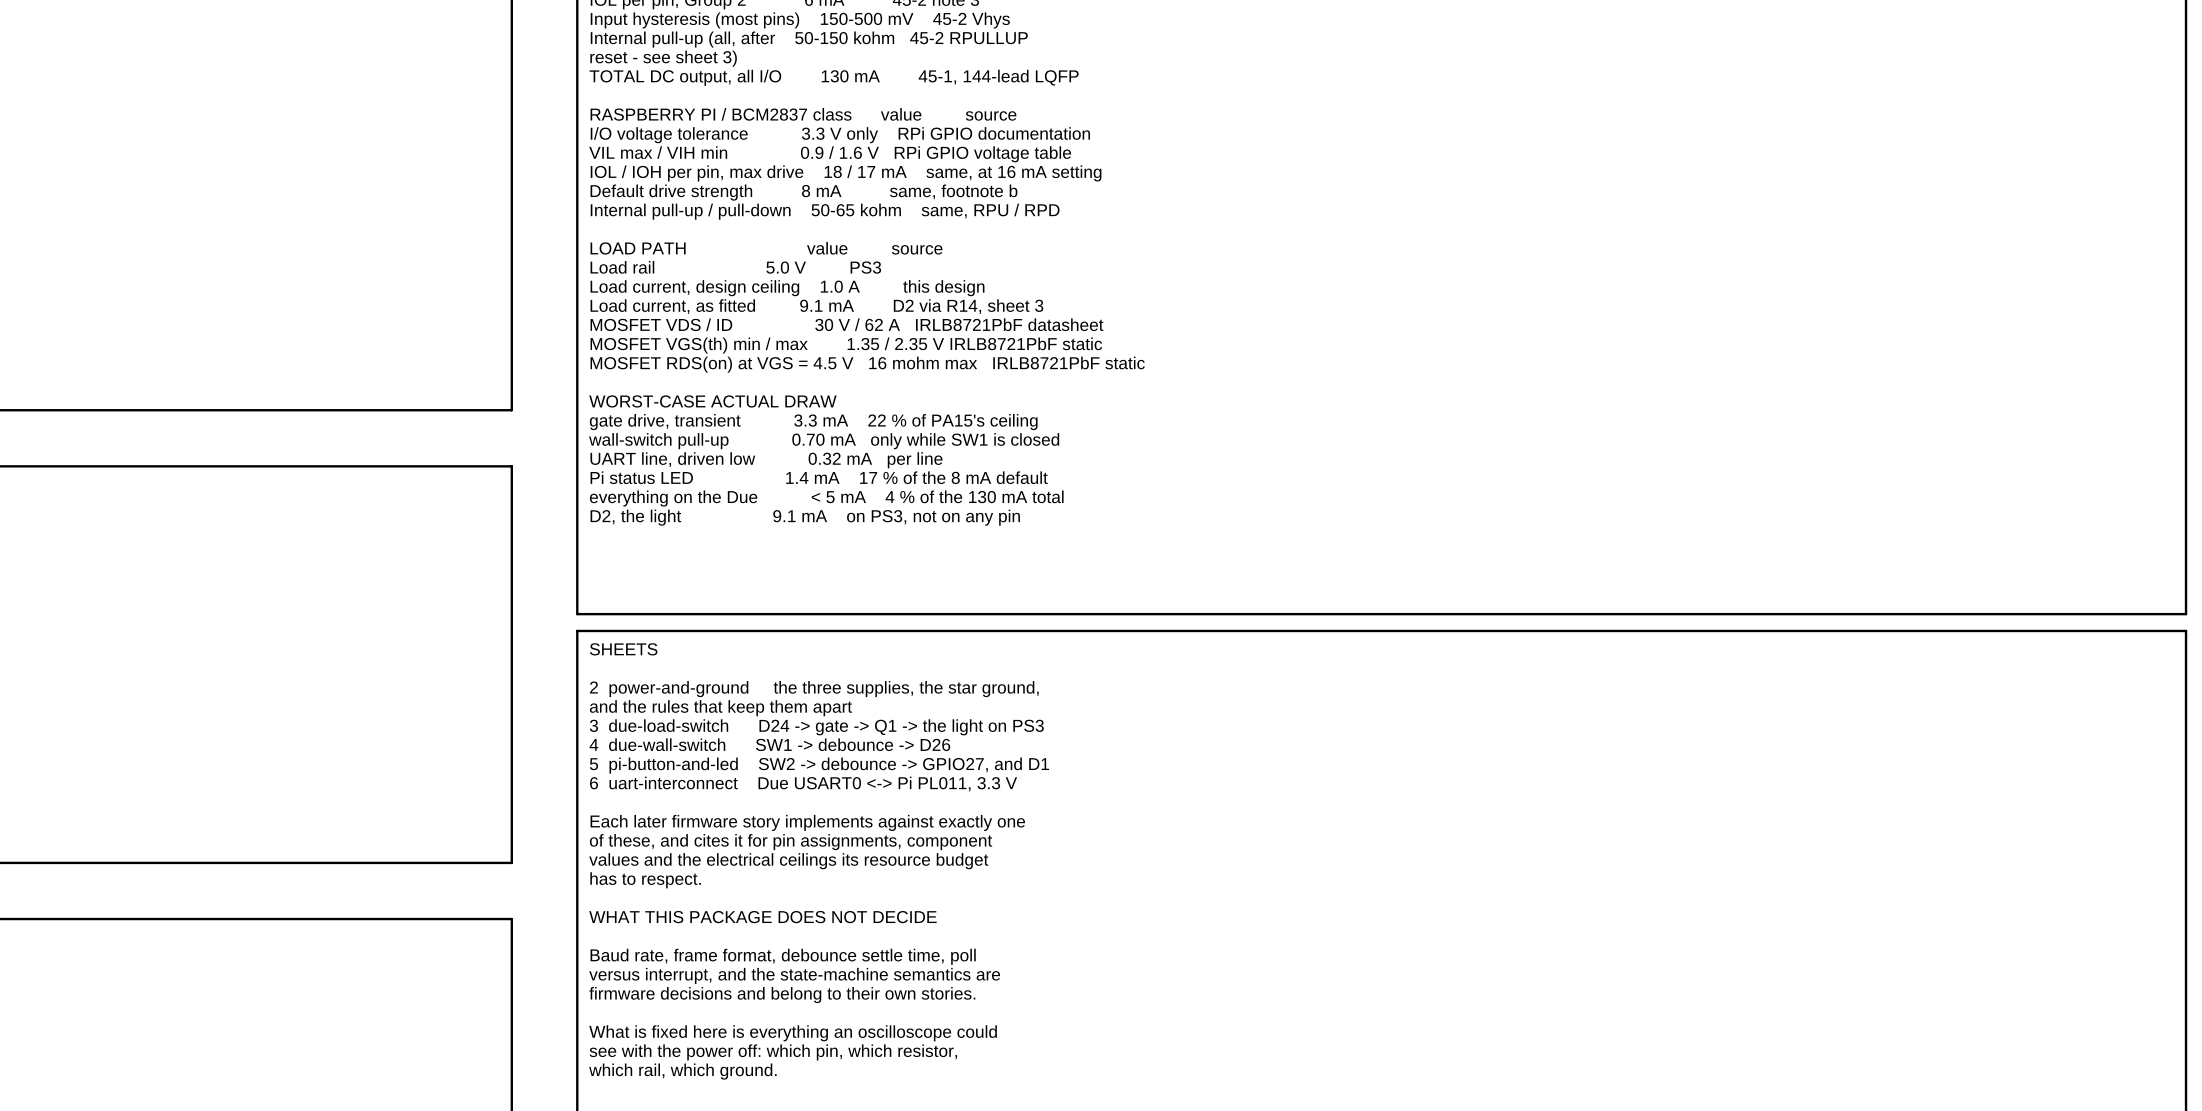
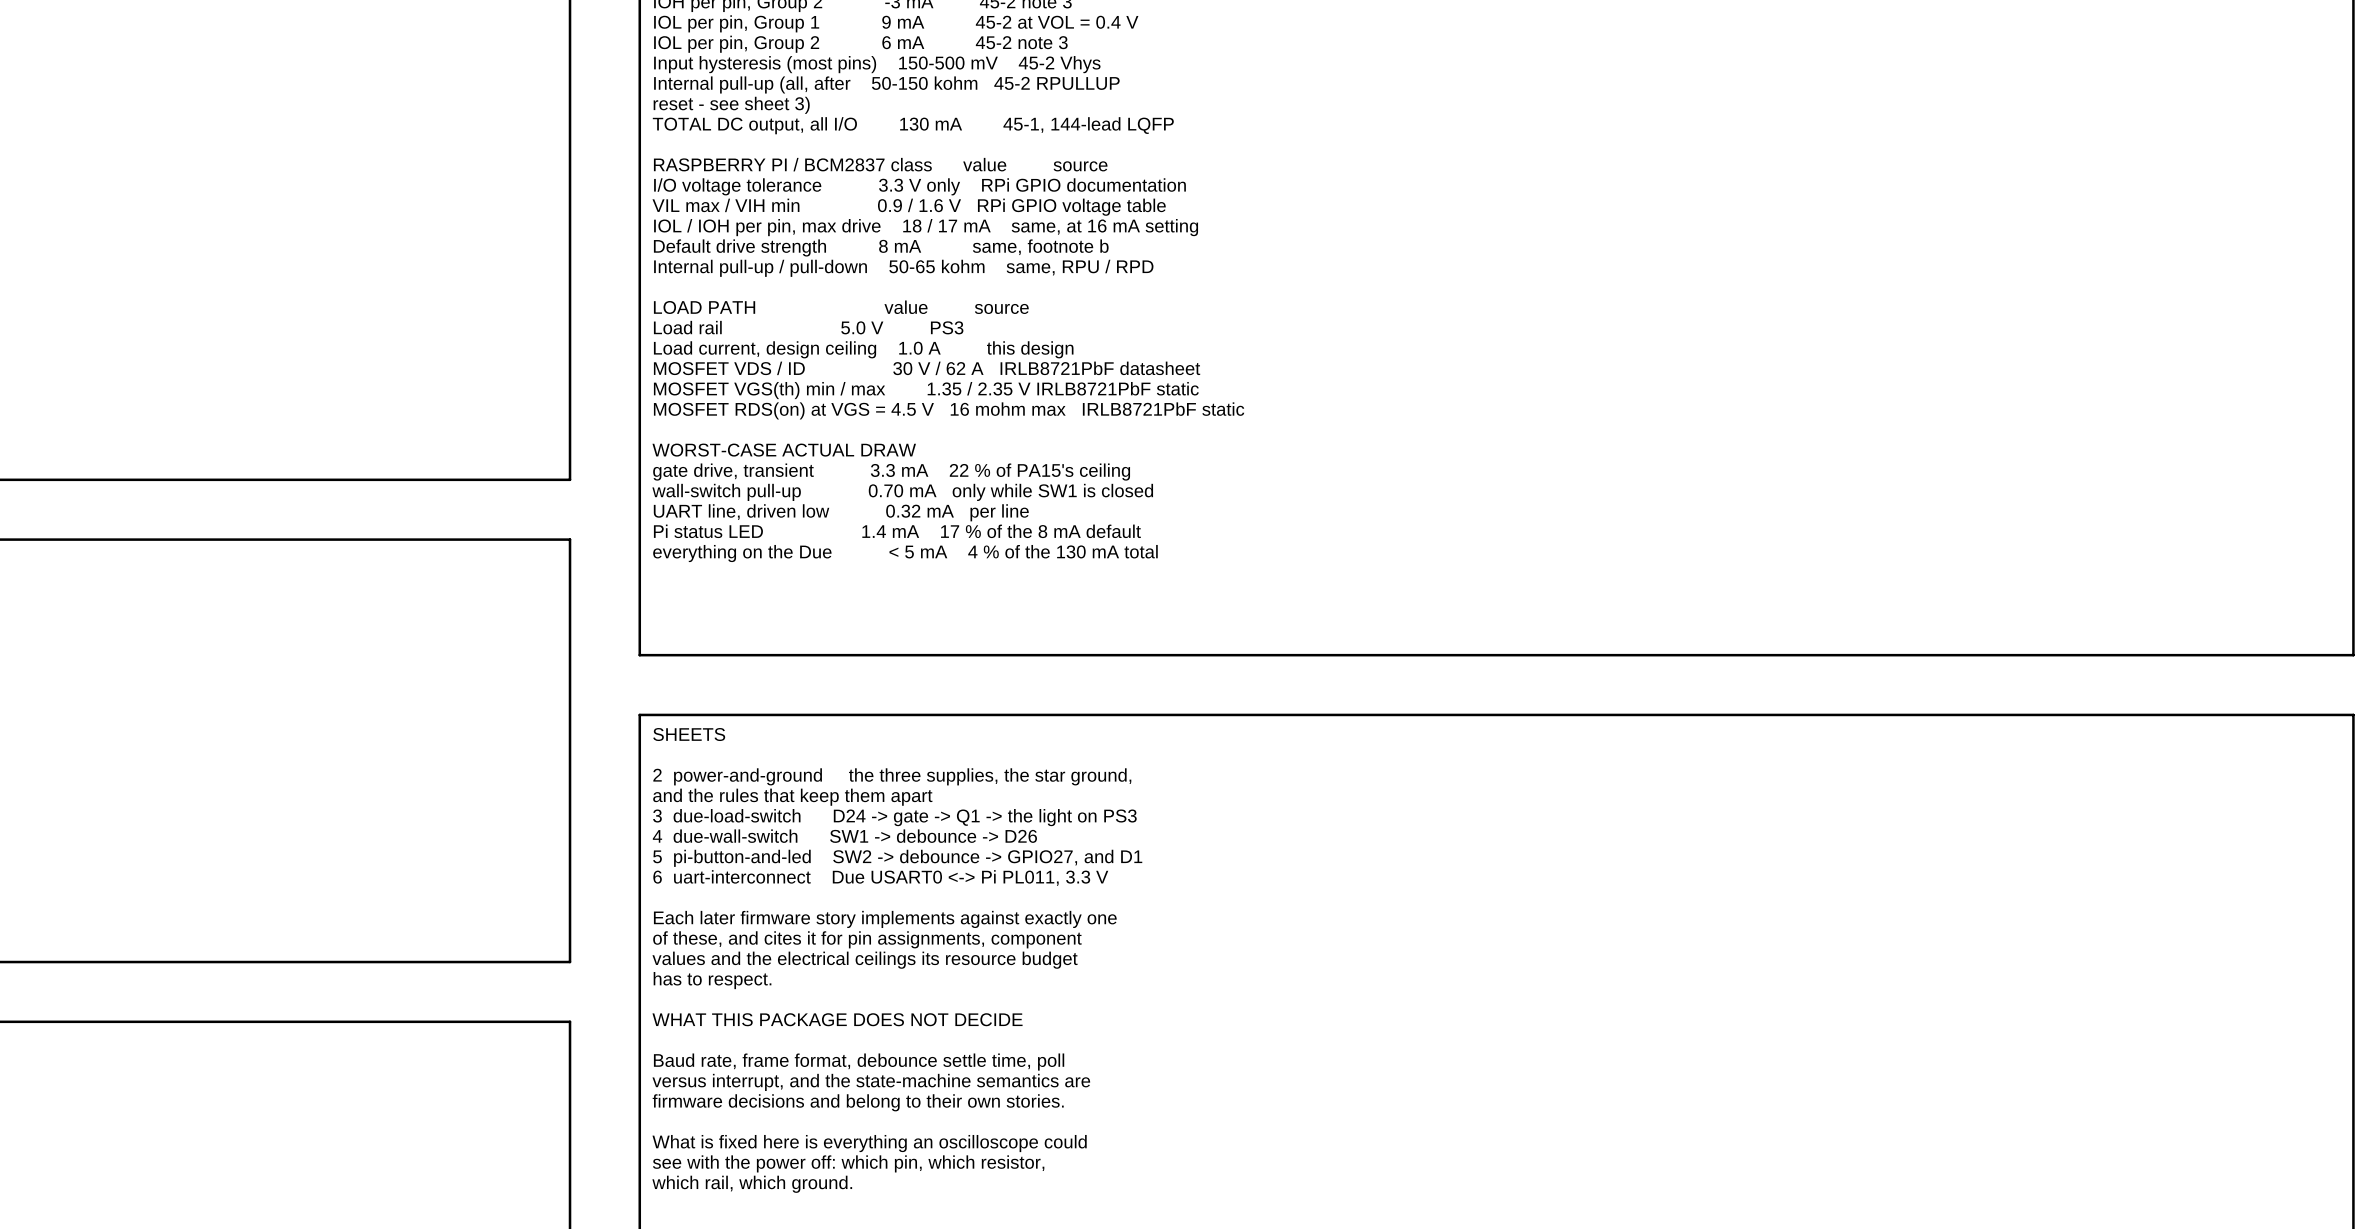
text: Load current, as fitted 9.1 mA D2 via R14, sheet 3 (816, 306) -> MOSFET VDS / ID 30 V / 62 A IRLB8721PbF datasheet (927, 368)
text: MOSFET VDS / ID 30 V / 62 A IRLB8721PbF datasheet (846, 324) -> MOSFET VGS(th) min / max 1.35 / 2.35 V IRLB8721PbF static (926, 390)
text: MOSFET VGS(th) min / max 1.35 / 2.35 V IRLB8721PbF static (846, 345) -> MOSFET RDS(on) at VGS = 4.5 V 16 mohm max IRLB8721PbF static (949, 410)
text: MOSFET RDS(on) at VGS = 4.5 V 16 mohm max IRLB8721PbF static (867, 364) -> none
text: none -> WORST-CASE ACTUAL DRAW (784, 450)
text: WORST-CASE ACTUAL DRAW (712, 401) -> gate drive, transient 3.3 mA 22 % of PA15's ceiling (891, 472)
text: gate drive, transient 3.3 mA 22 % of PA15's ceiling (813, 422) -> wall-switch pull-up 0.70 mA only while SW1 is closed (902, 492)
text: wall-switch pull-up 0.70 mA only while SW1 is closed (824, 441) -> UART line, driven low 0.32 mA per line (841, 512)
text: UART line, driven low 0.32 mA per line (766, 460) -> Pi status LED 1.4 mA 17 % of the 8 mA default (897, 531)
text: Pi status LED 1.4 mA 17 % of the 8 mA default (819, 477) -> everything on the Due < 5 mA 4 % of the 130 mA total (905, 553)
text: everything on the Due < 5 mA 4 % of the 130 mA total (826, 498) -> none
text: D2, the light 9.1 mA on PS3, not on any pin (805, 517) -> none
line: (577, 574) (577, 614) (2186, 614) (2186, 574) -> (639, 655) (2353, 655)

